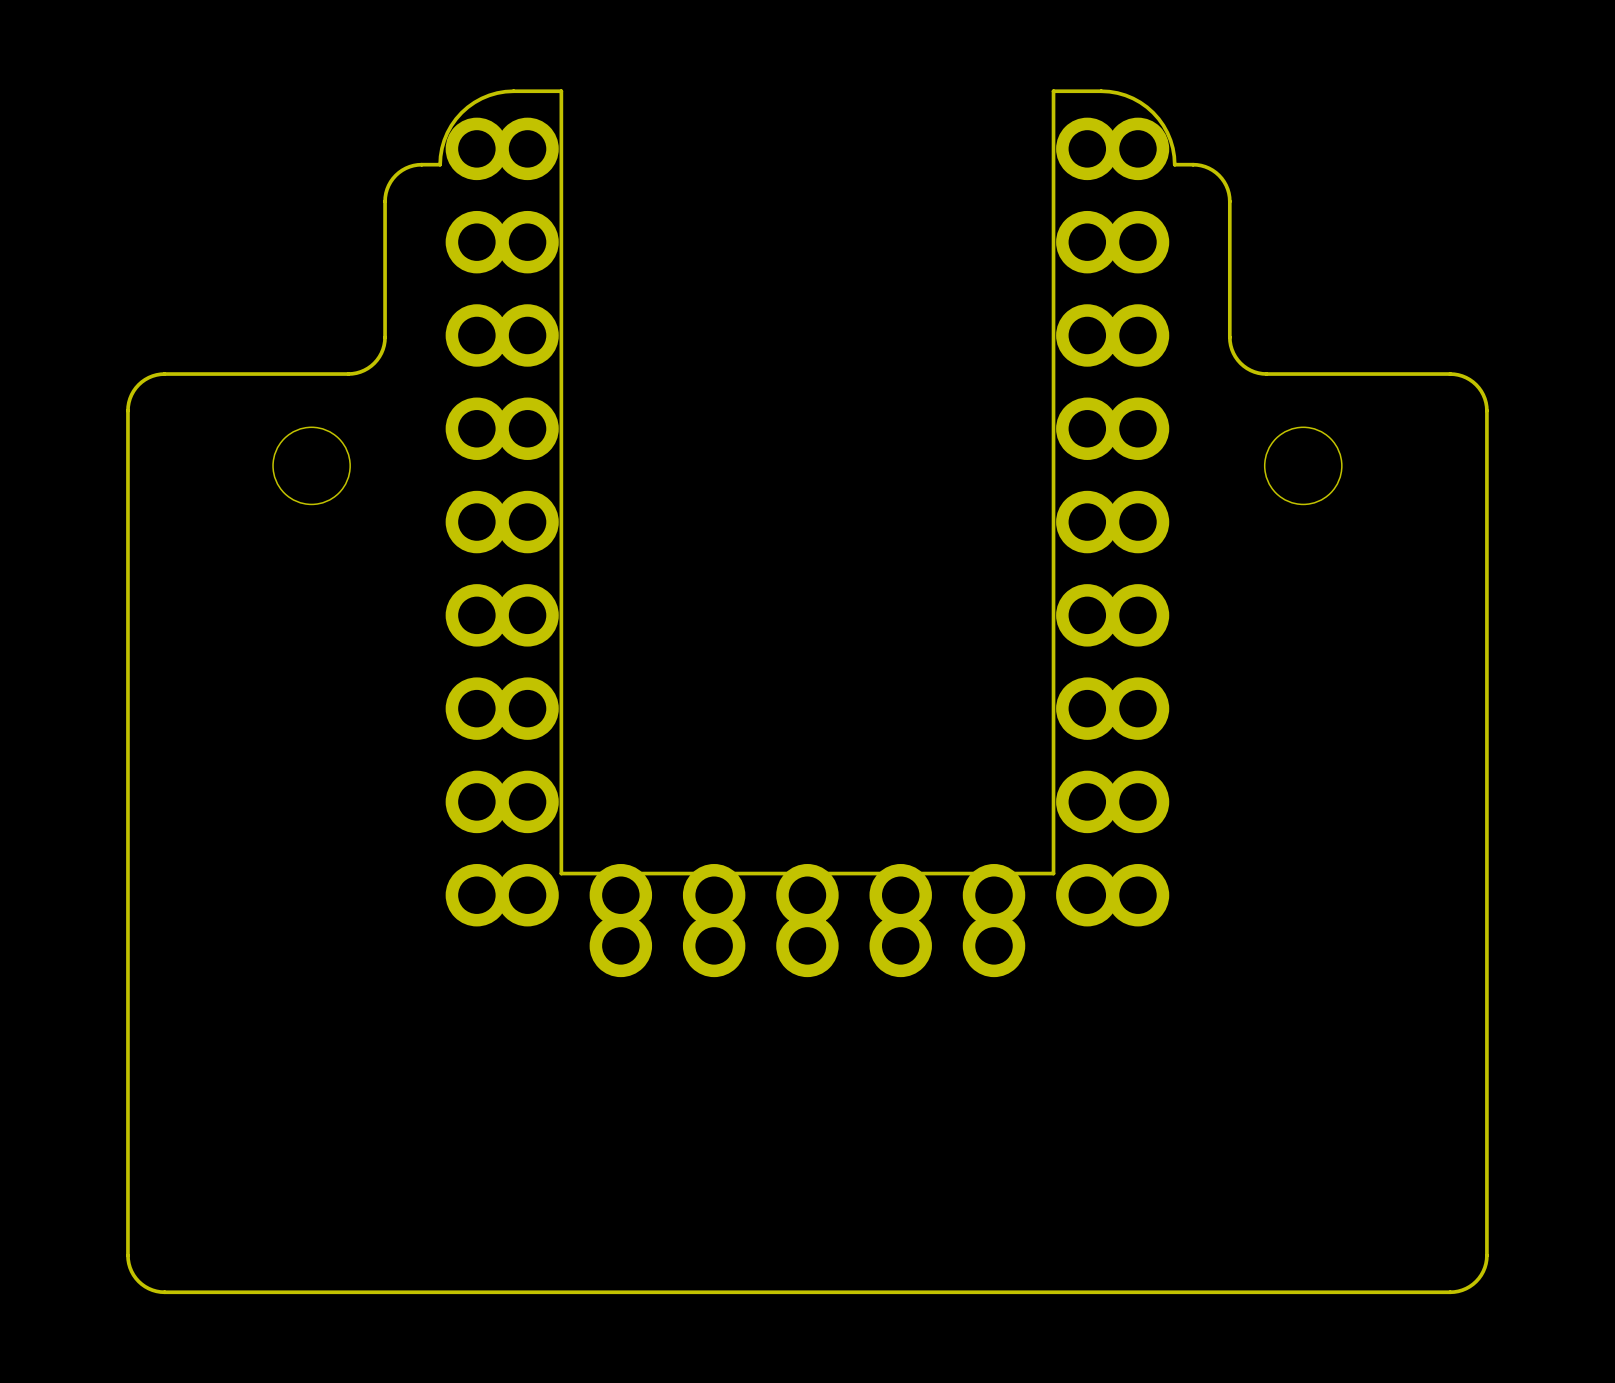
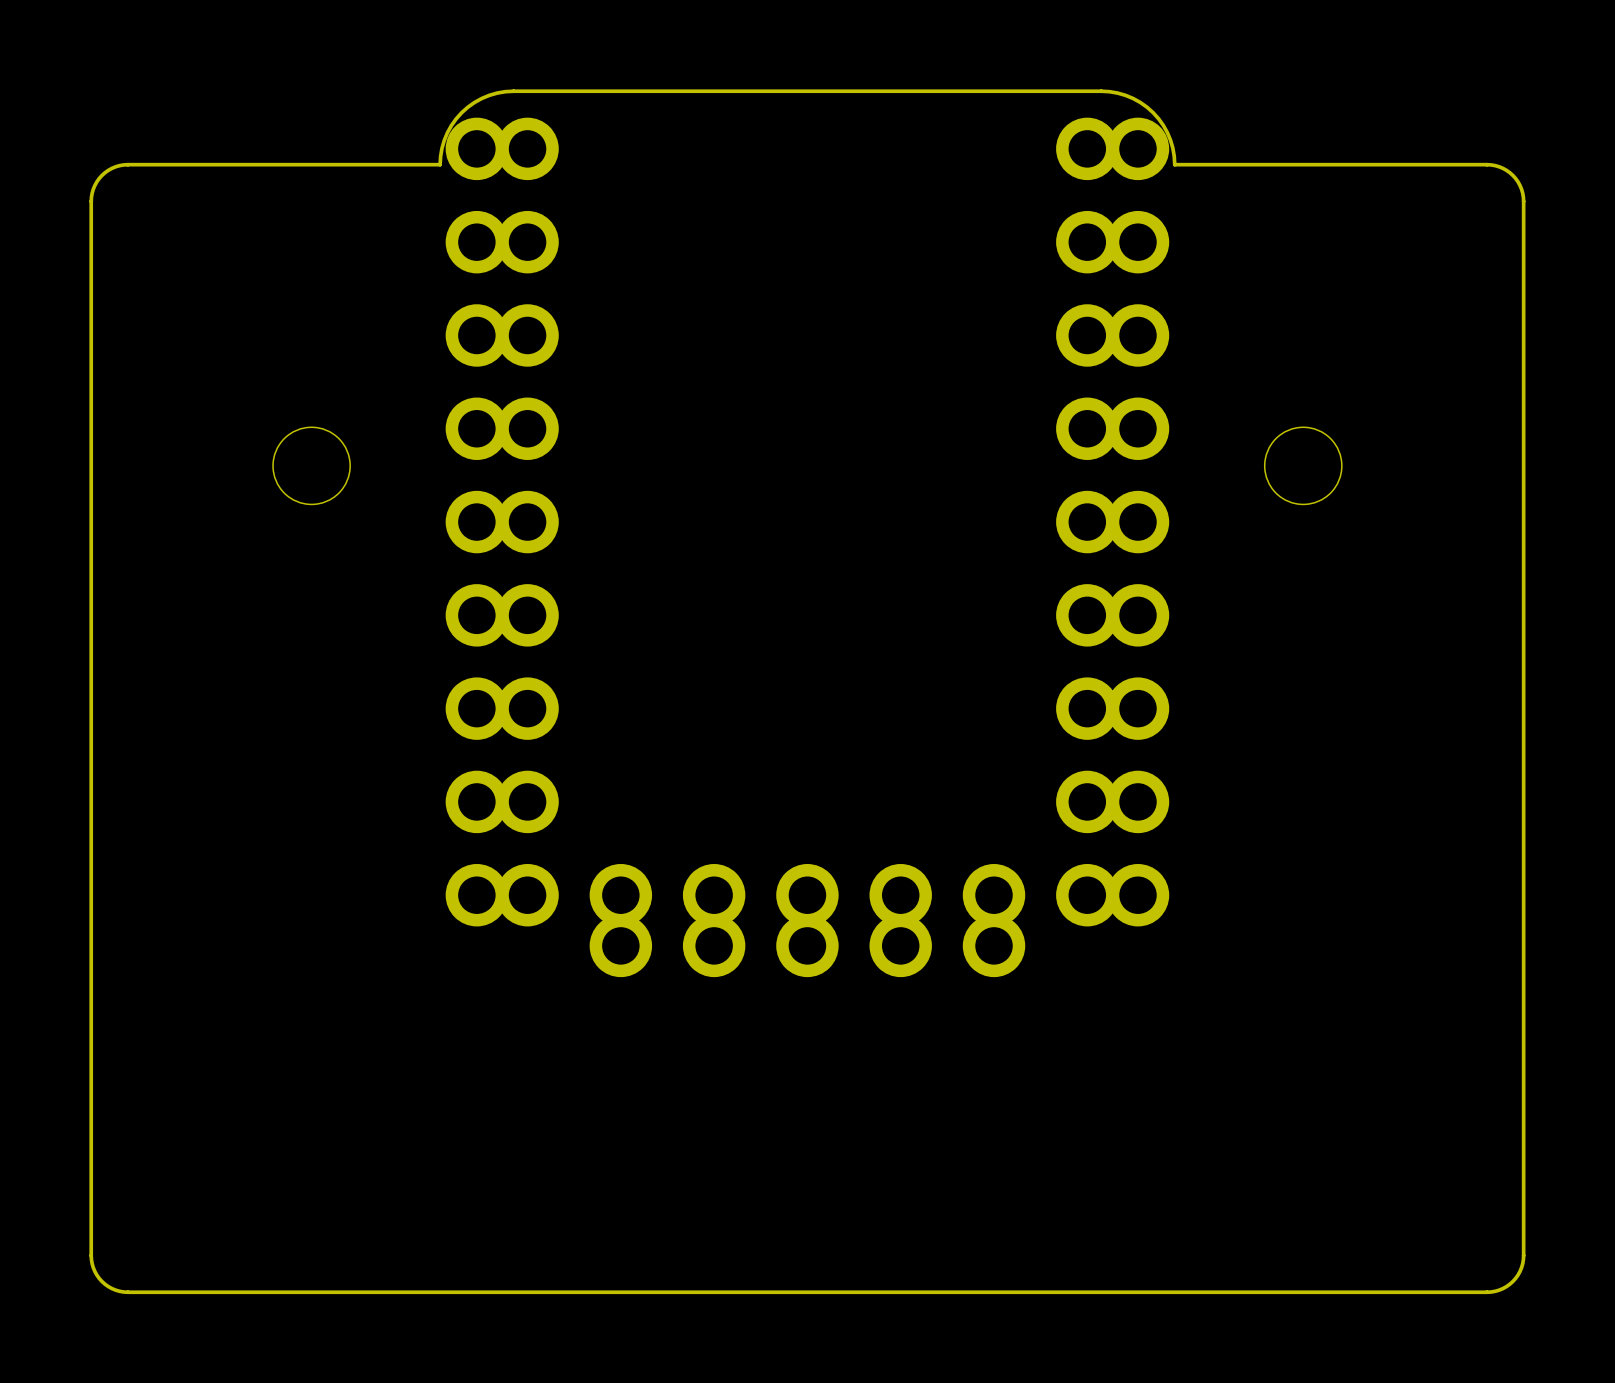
board edge: (1053, 91) (1053, 873) (561, 873) (561, 91) -> (1053, 91) (561, 91)
board edge: (421, 164) (409, 166) (398, 172) (390, 181) (385, 193) (384, 341) (379, 356) (371, 366) (360, 371) (348, 374) (160, 374) (141, 382) (133, 391) (128, 402) (127, 1255) (131, 1271) (138, 1281) (148, 1288) (164, 1292) -> (421, 164) (123, 164) (112, 168) (101, 175) (92, 193) (91, 1259) (99, 1278) (112, 1288) (123, 1292) (164, 1292)
board edge: (1193, 164) (1205, 166) (1215, 172) (1224, 181) (1228, 193) (1230, 341) (1233, 353) (1243, 366) (1254, 371) (1266, 374) (1454, 374) (1473, 382) (1481, 391) (1486, 402) (1486, 1255) (1483, 1271) (1476, 1281) (1462, 1290) (1450, 1292) -> (1193, 164) (1491, 164) (1509, 172) (1518, 181) (1522, 193) (1523, 1259) (1518, 1275) (1502, 1288) (1491, 1292) (1450, 1292)

